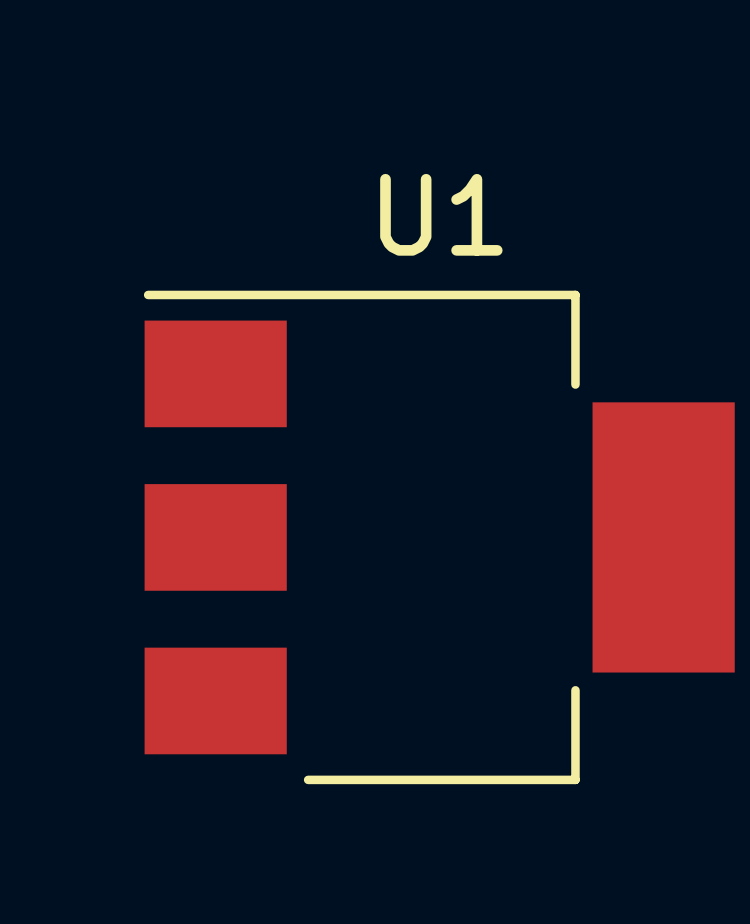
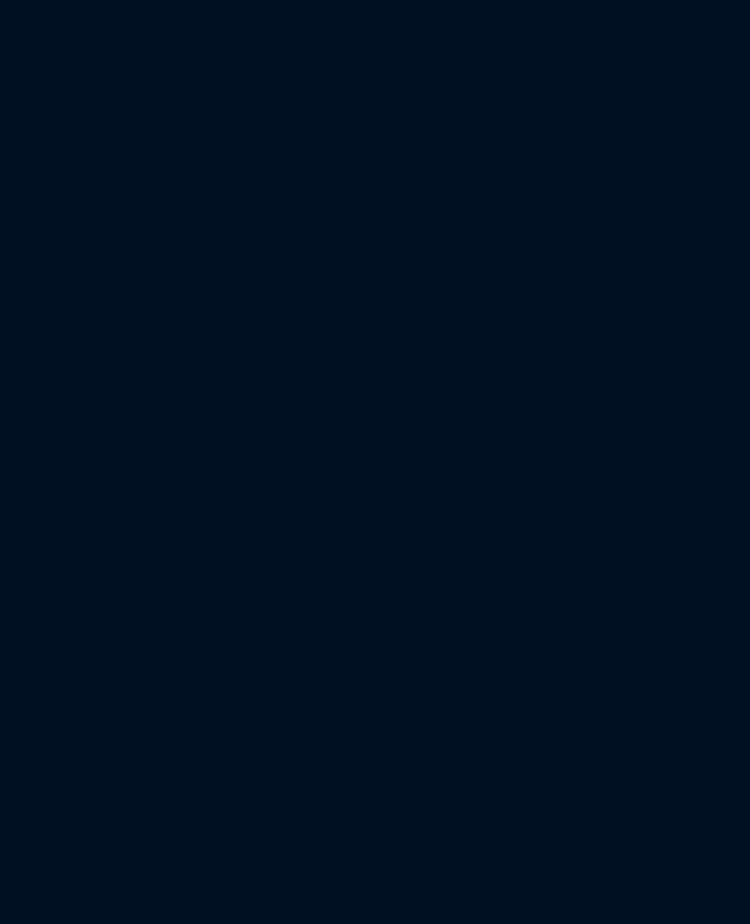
U1: (439, 537) -> none

